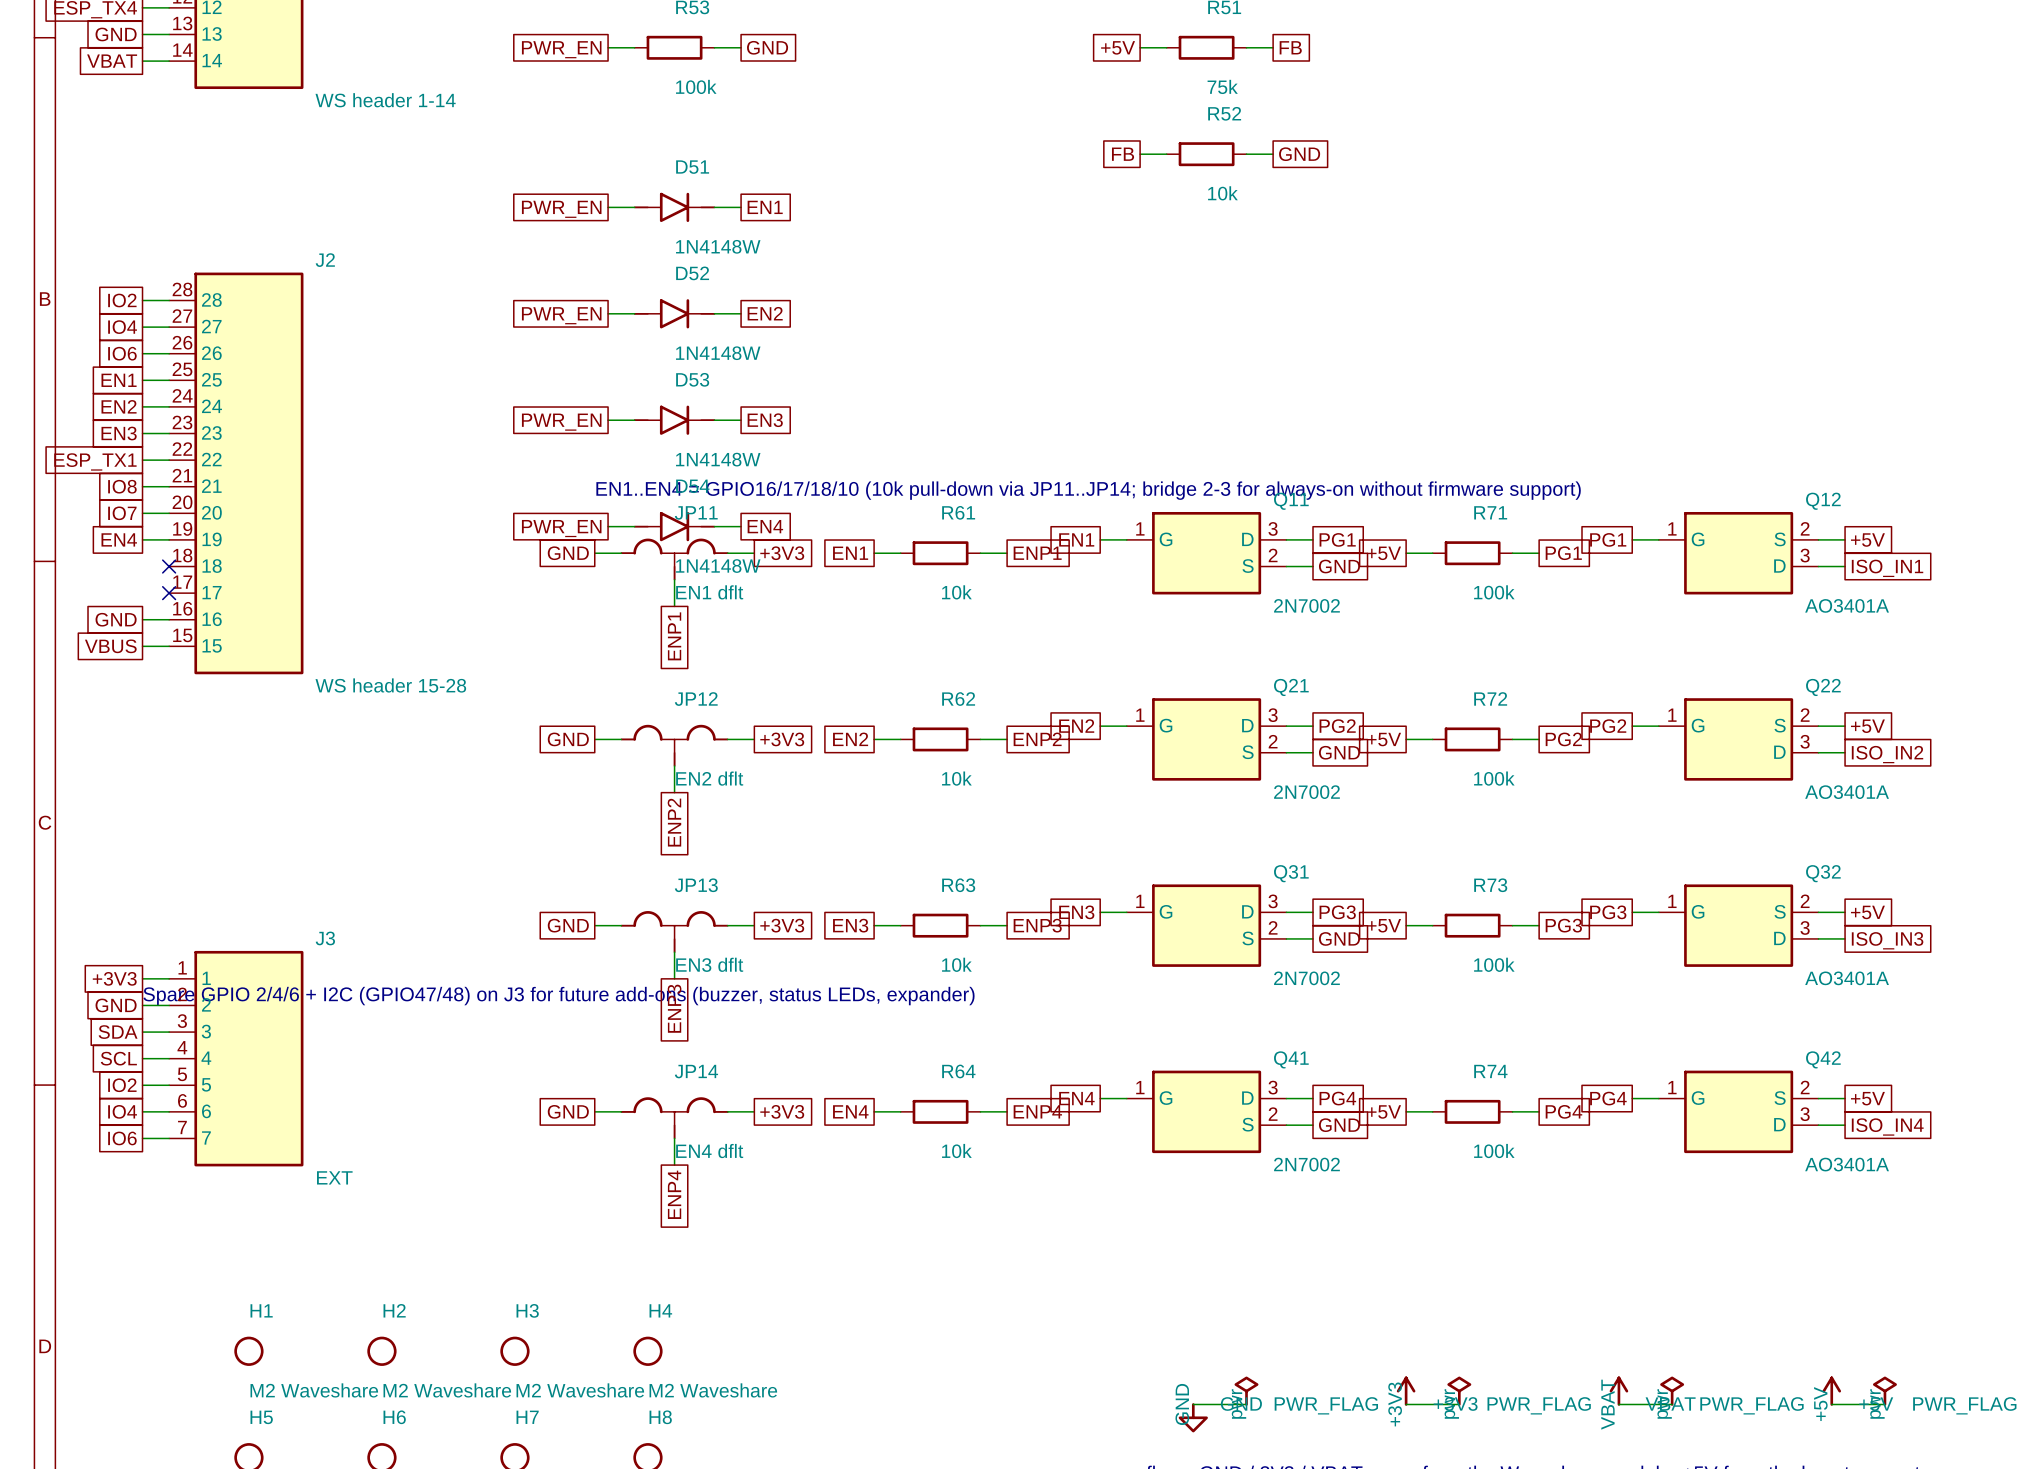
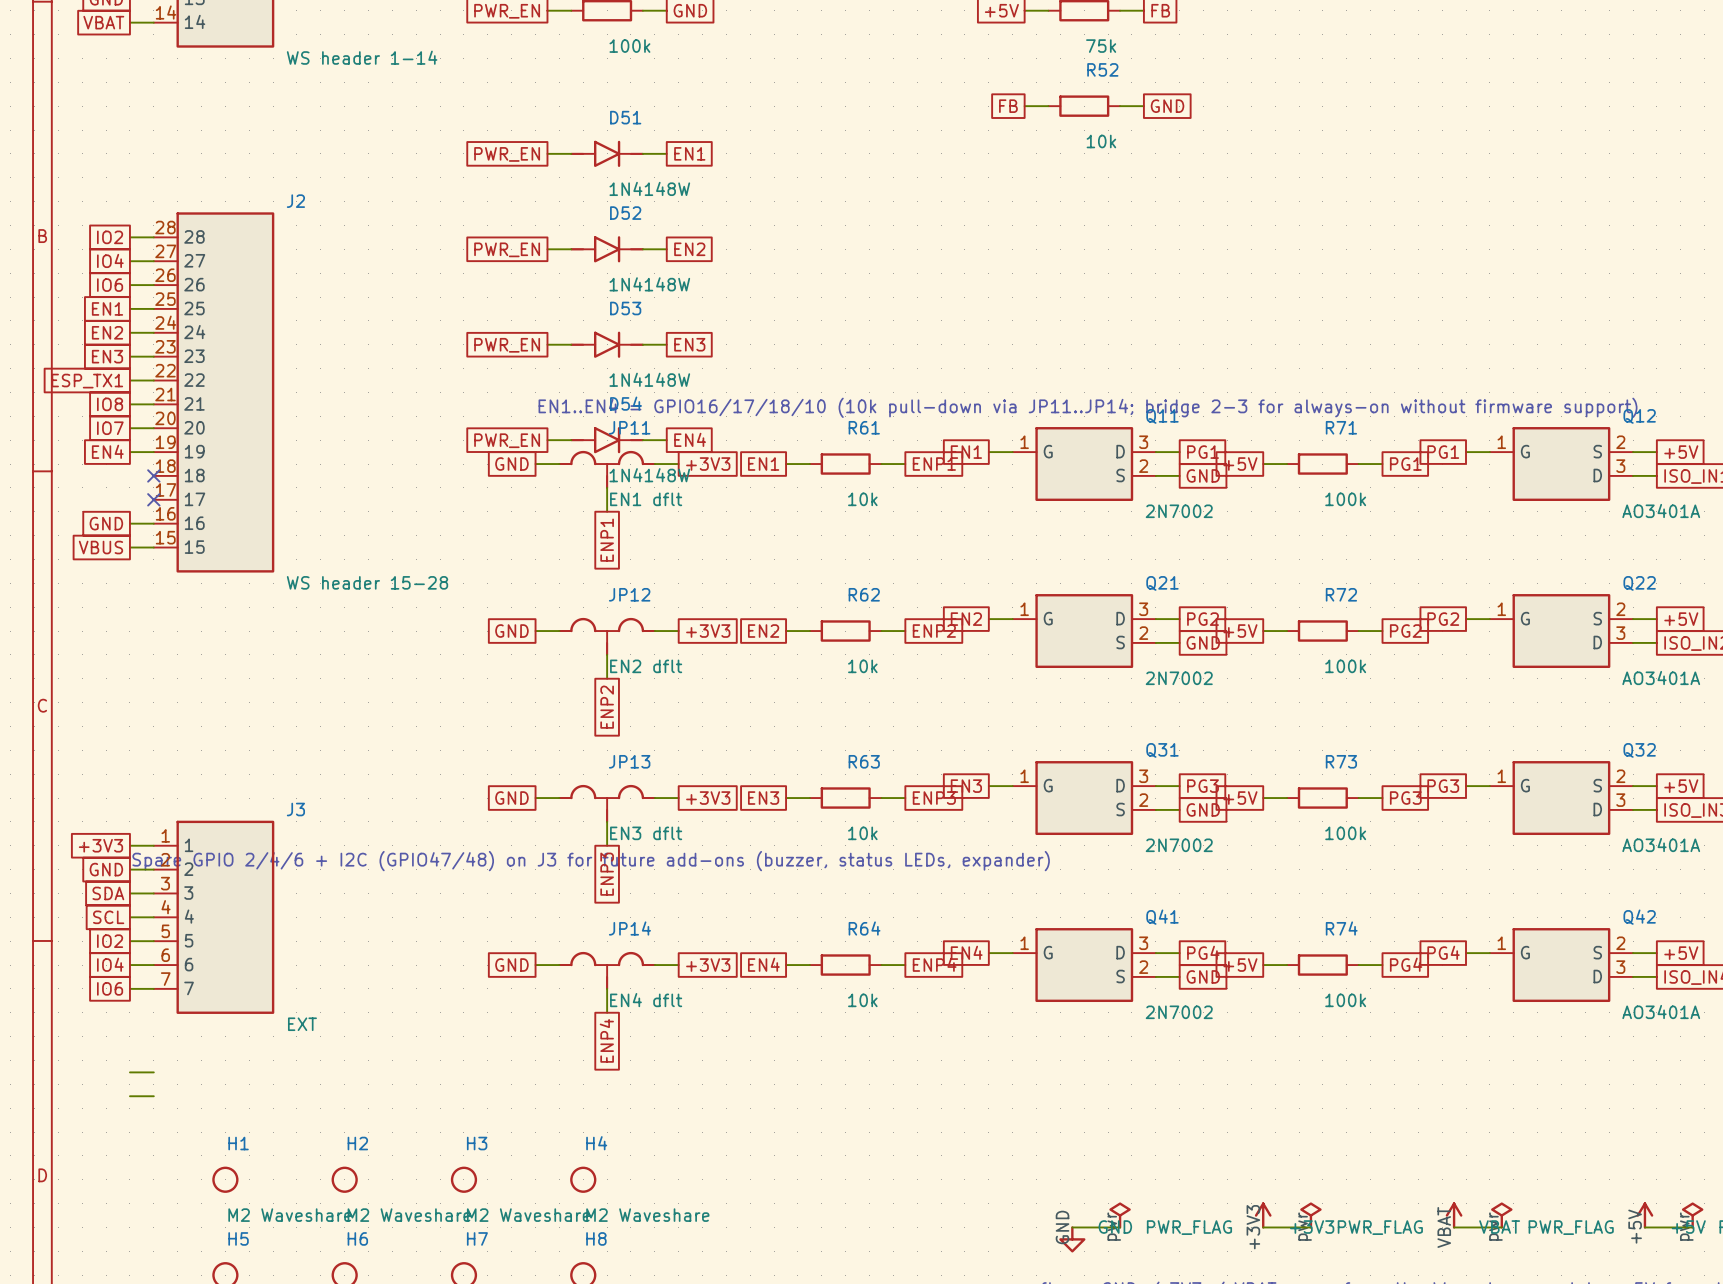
wire: none -> (129, 1072) (153, 1072)
wire: none -> (129, 1096) (153, 1096)

